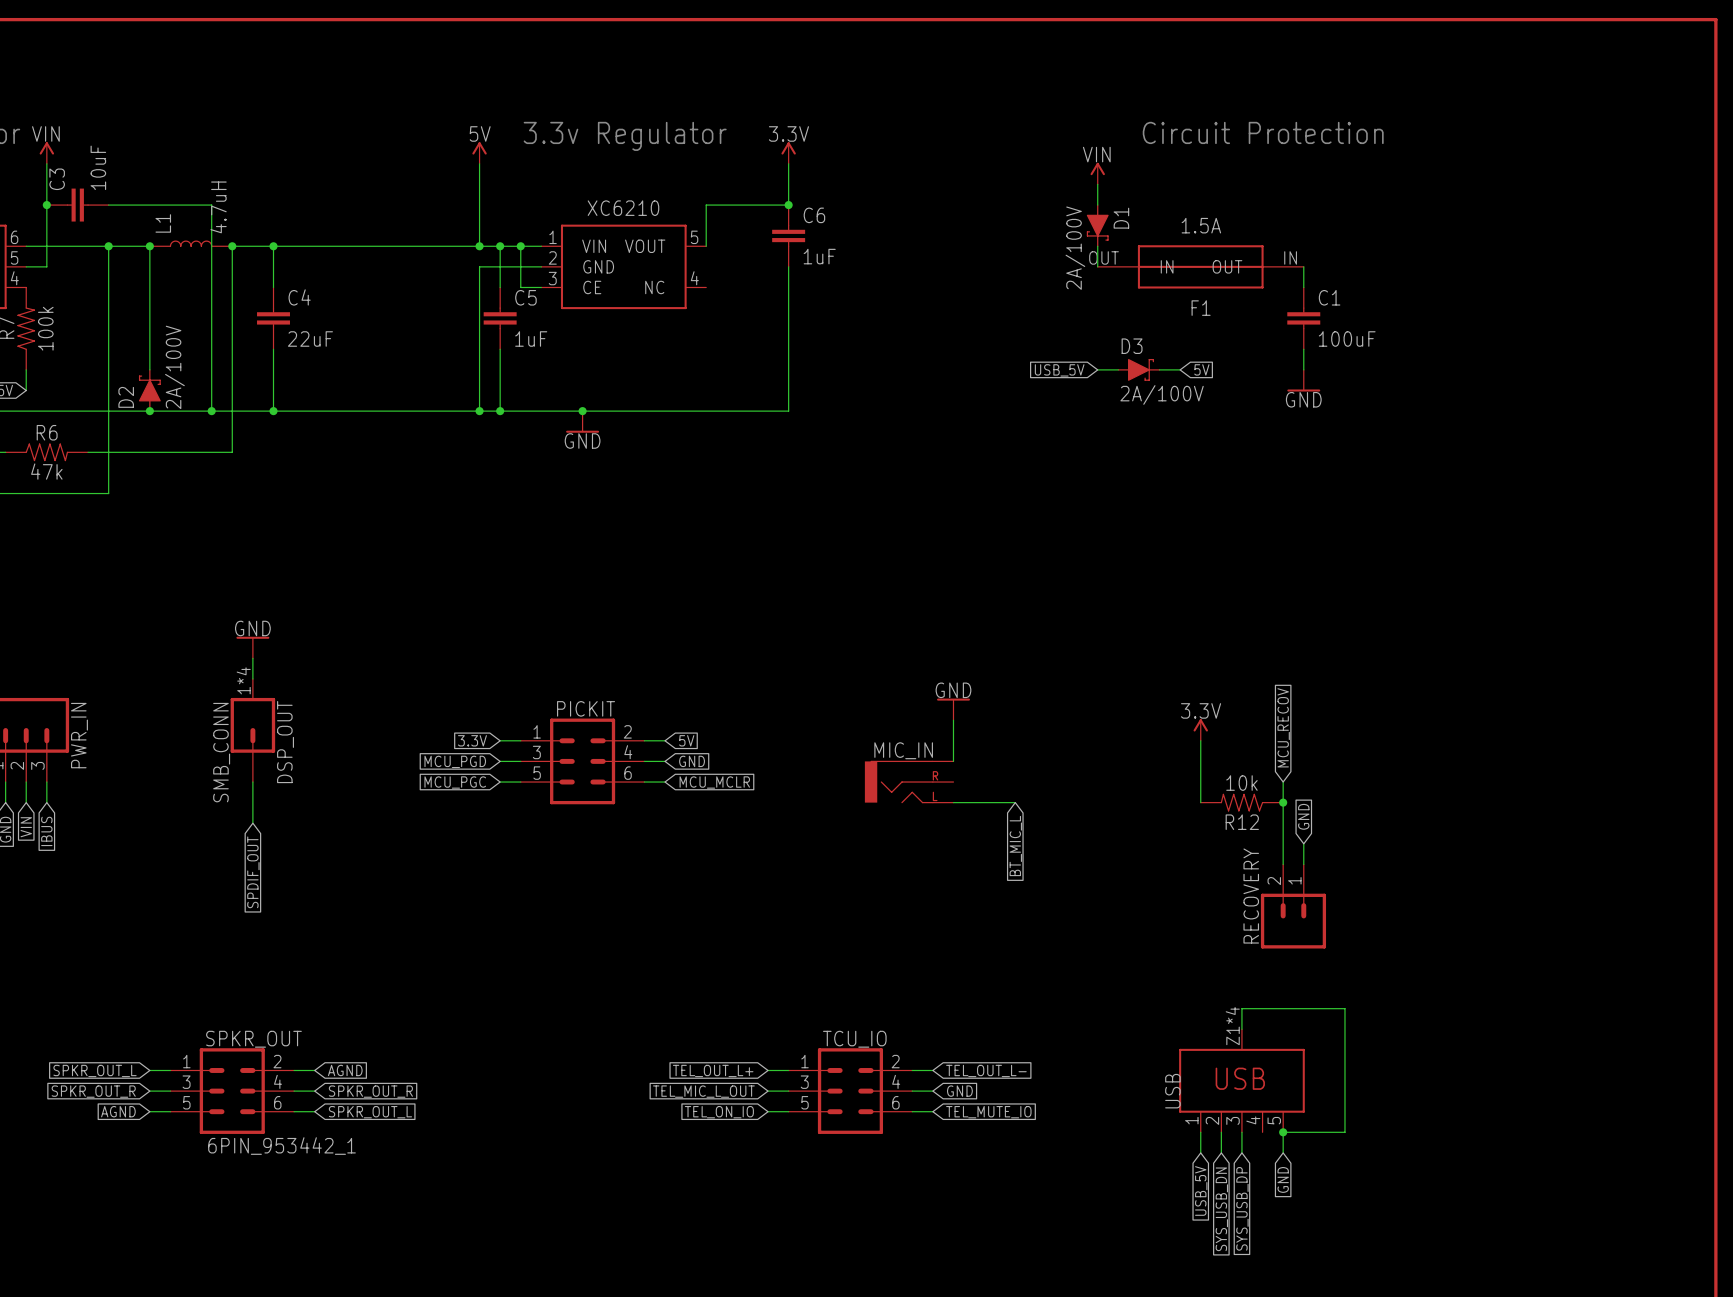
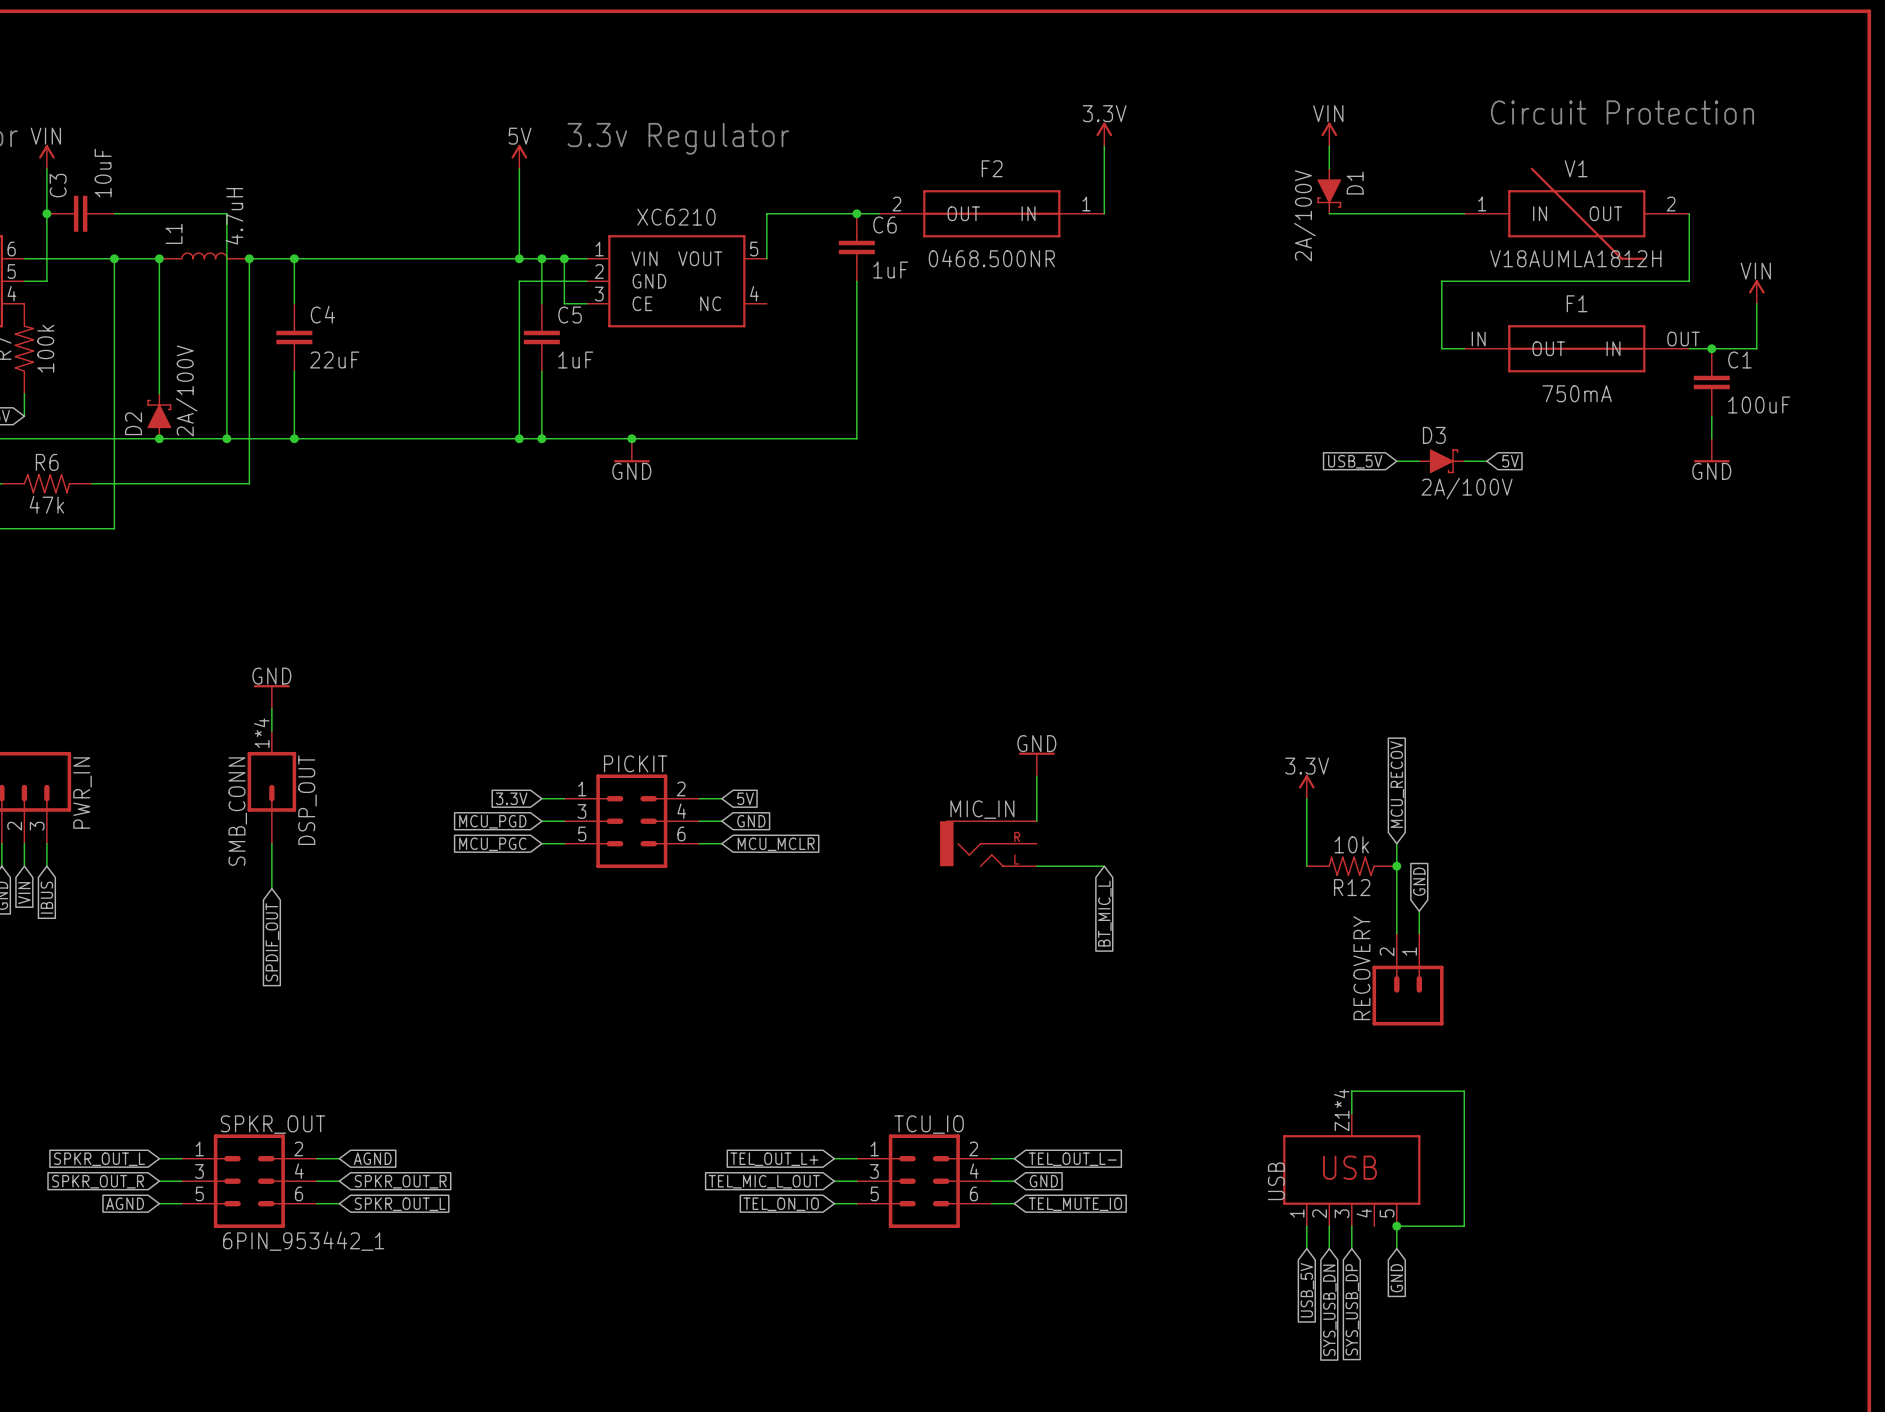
text: none -> Circuit Protection (1622, 112)
power symbol: none -> 3.3V (1104, 134)
text: Circuit Protection (1263, 132) -> none
wire: none -> (1104, 146) (1104, 213)
power symbol: 3.3V (788, 153) -> none
wire: (788, 163) (788, 205) -> (879, 213) (856, 213)
power symbol position: VIN (1097, 173) -> VIN (1329, 134)
wire: (1097, 184) (1097, 205) -> (1329, 146) (1329, 168)
F2: none -> 0468.500NR (991, 213)
wire: none -> (1329, 213) (1464, 213)
V1: none -> V18AUMLA1812H (1576, 213)
wire: none -> (1689, 213) (1689, 281) (1441, 281) (1441, 348) (1464, 348)
D1 position: (1097, 225) -> (1329, 191)
F1 value: 1.5A (1201, 225) -> 750mA (1577, 393)
wire: (1097, 246) (1097, 266) -> none
F1 rotation: 0° (1200, 266) -> 180° (1576, 348)
F1 position: (1200, 266) -> (1576, 348)
wire: (1303, 266) (1303, 287) -> none
power symbol: none -> VIN (1756, 291)
wire: none -> (1756, 303) (1756, 348) (1689, 348)
C1 position: (1303, 318) -> (1711, 382)
junction: none -> (1711, 348)
wire: (1303, 349) (1303, 369) -> none
wire: (1097, 369) (1118, 369) -> (1396, 461) (1419, 461)
D3 position: (1138, 369) -> (1441, 461)
wire: (1159, 369) (1180, 369) -> (1464, 461) (1486, 461)
global label position: 5V (1201, 369) -> 5V (1510, 461)
global label position: USB_5V (1059, 370) -> USB_5V (1355, 461)
power symbol: GND (1303, 380) -> none
wire: none -> (1711, 416) (1711, 438)
power symbol: none -> GND (1711, 450)

